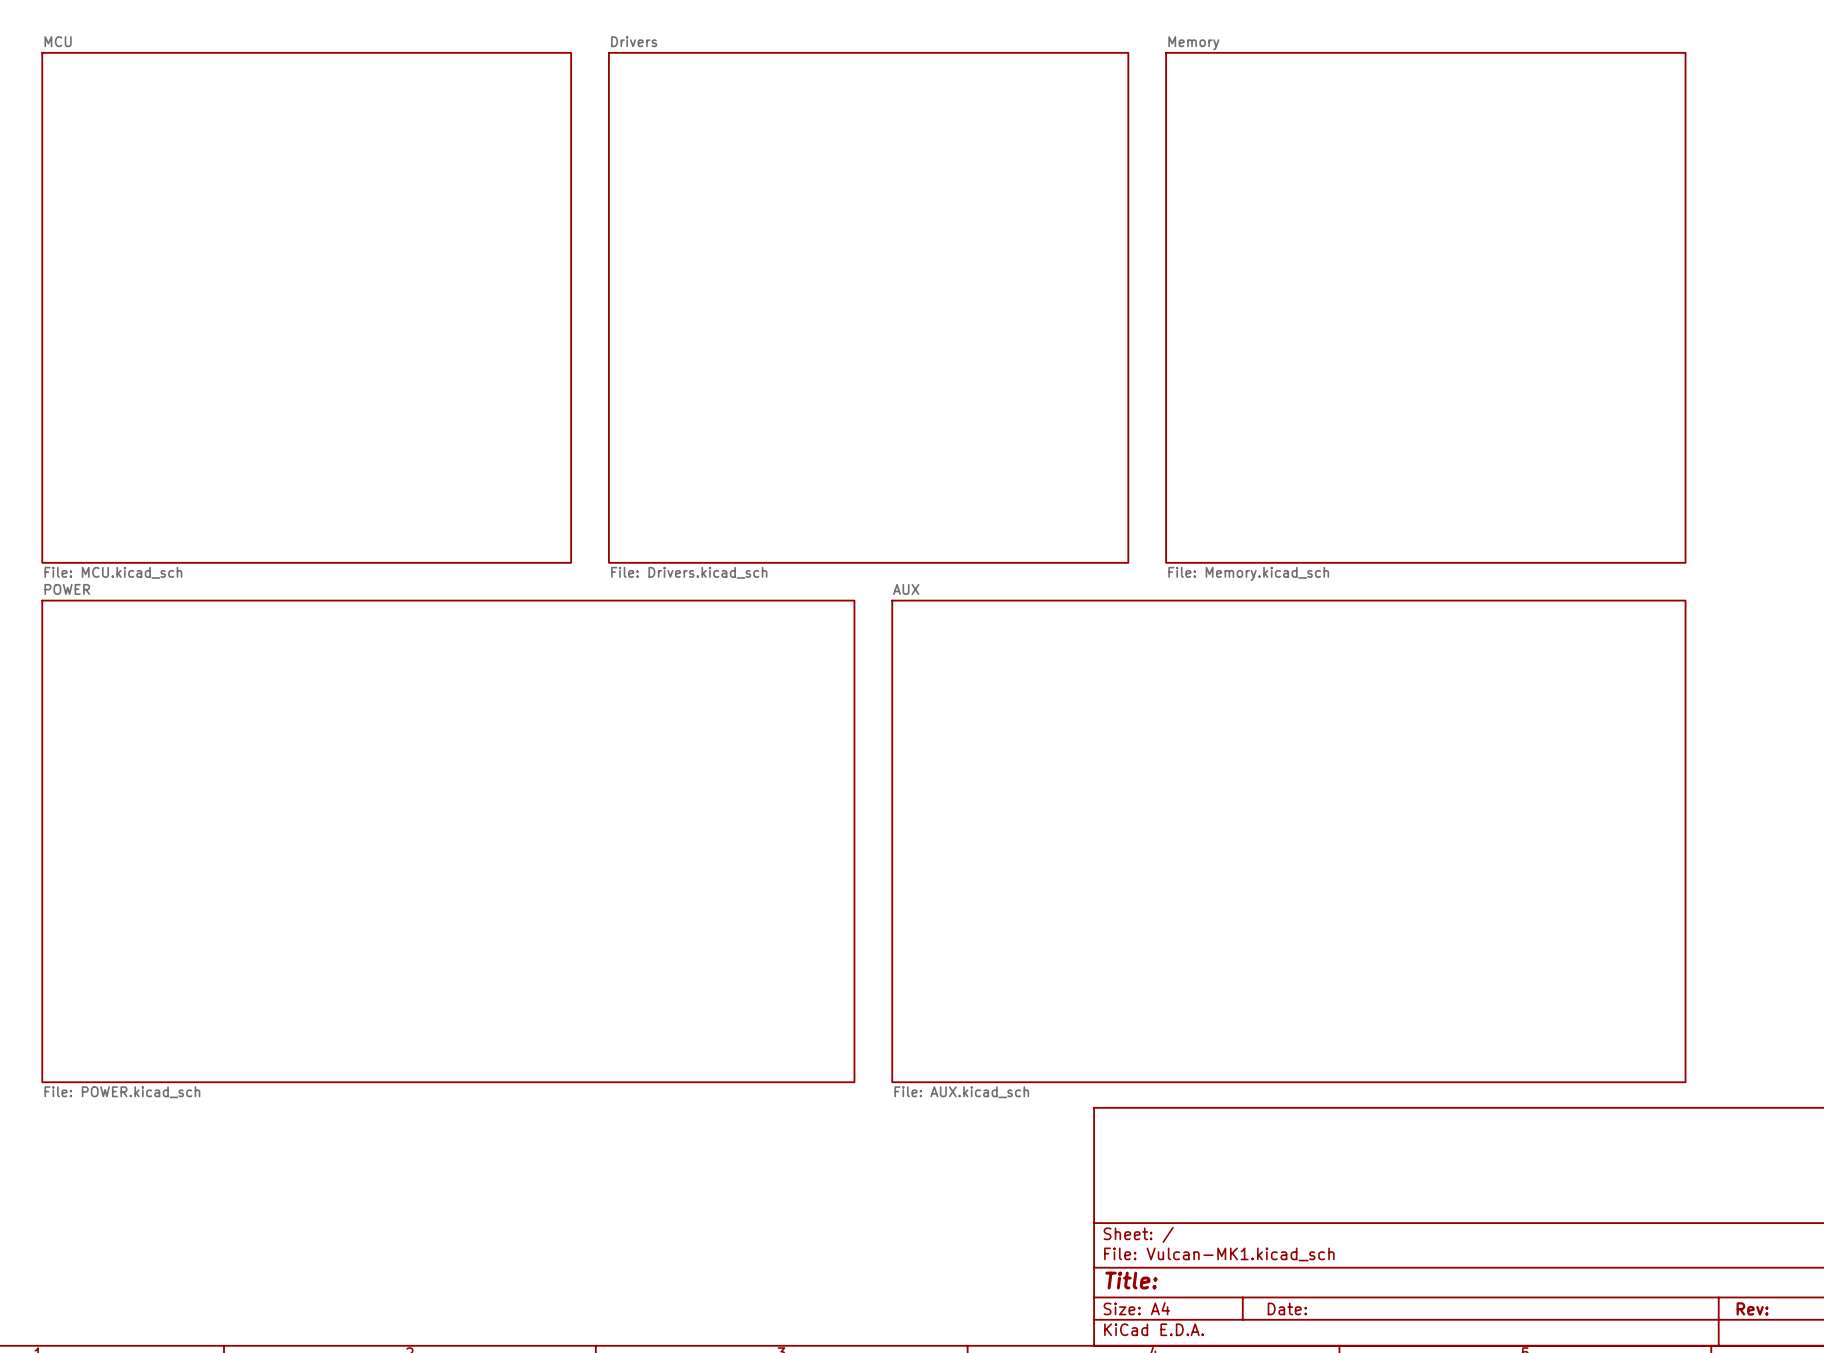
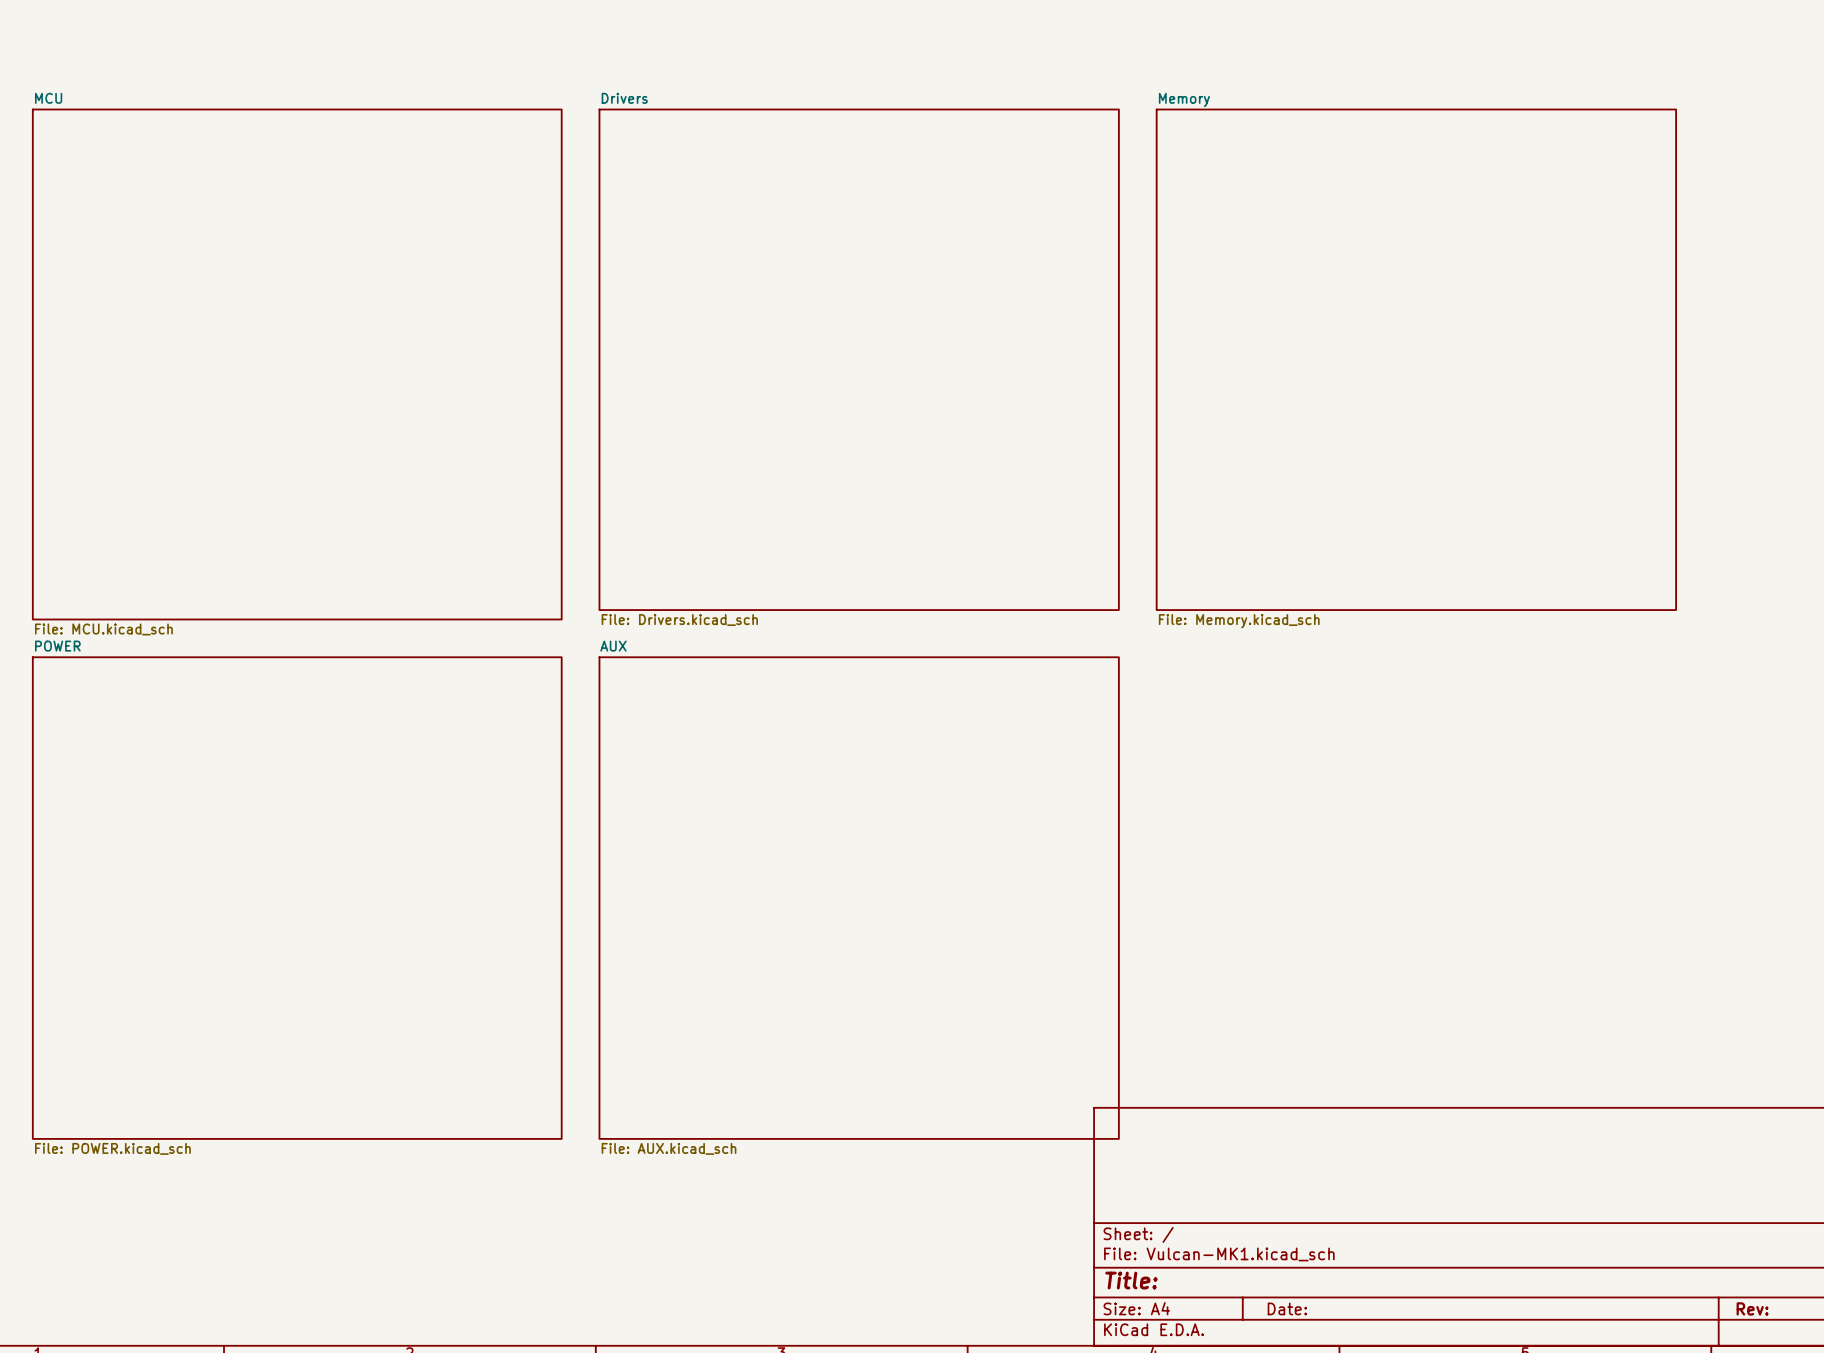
sheet MCU position: (306, 307) -> (297, 364)
sheet Drivers: File: Drivers.kicad_sch (868, 307) -> none
sheet Memory: File: Memory.kicad_sch (1425, 307) -> none
sheet Drivers: none -> File: Drivers.kicad_sch (859, 359)
sheet Memory: none -> File: Memory.kicad_sch (1416, 359)
sheet POWER: File: POWER.kicad_sch (448, 841) -> none
sheet AUX: File: AUX.kicad_sch (1288, 841) -> none
sheet POWER: none -> File: POWER.kicad_sch (297, 898)
sheet AUX: none -> File: AUX.kicad_sch (859, 898)

